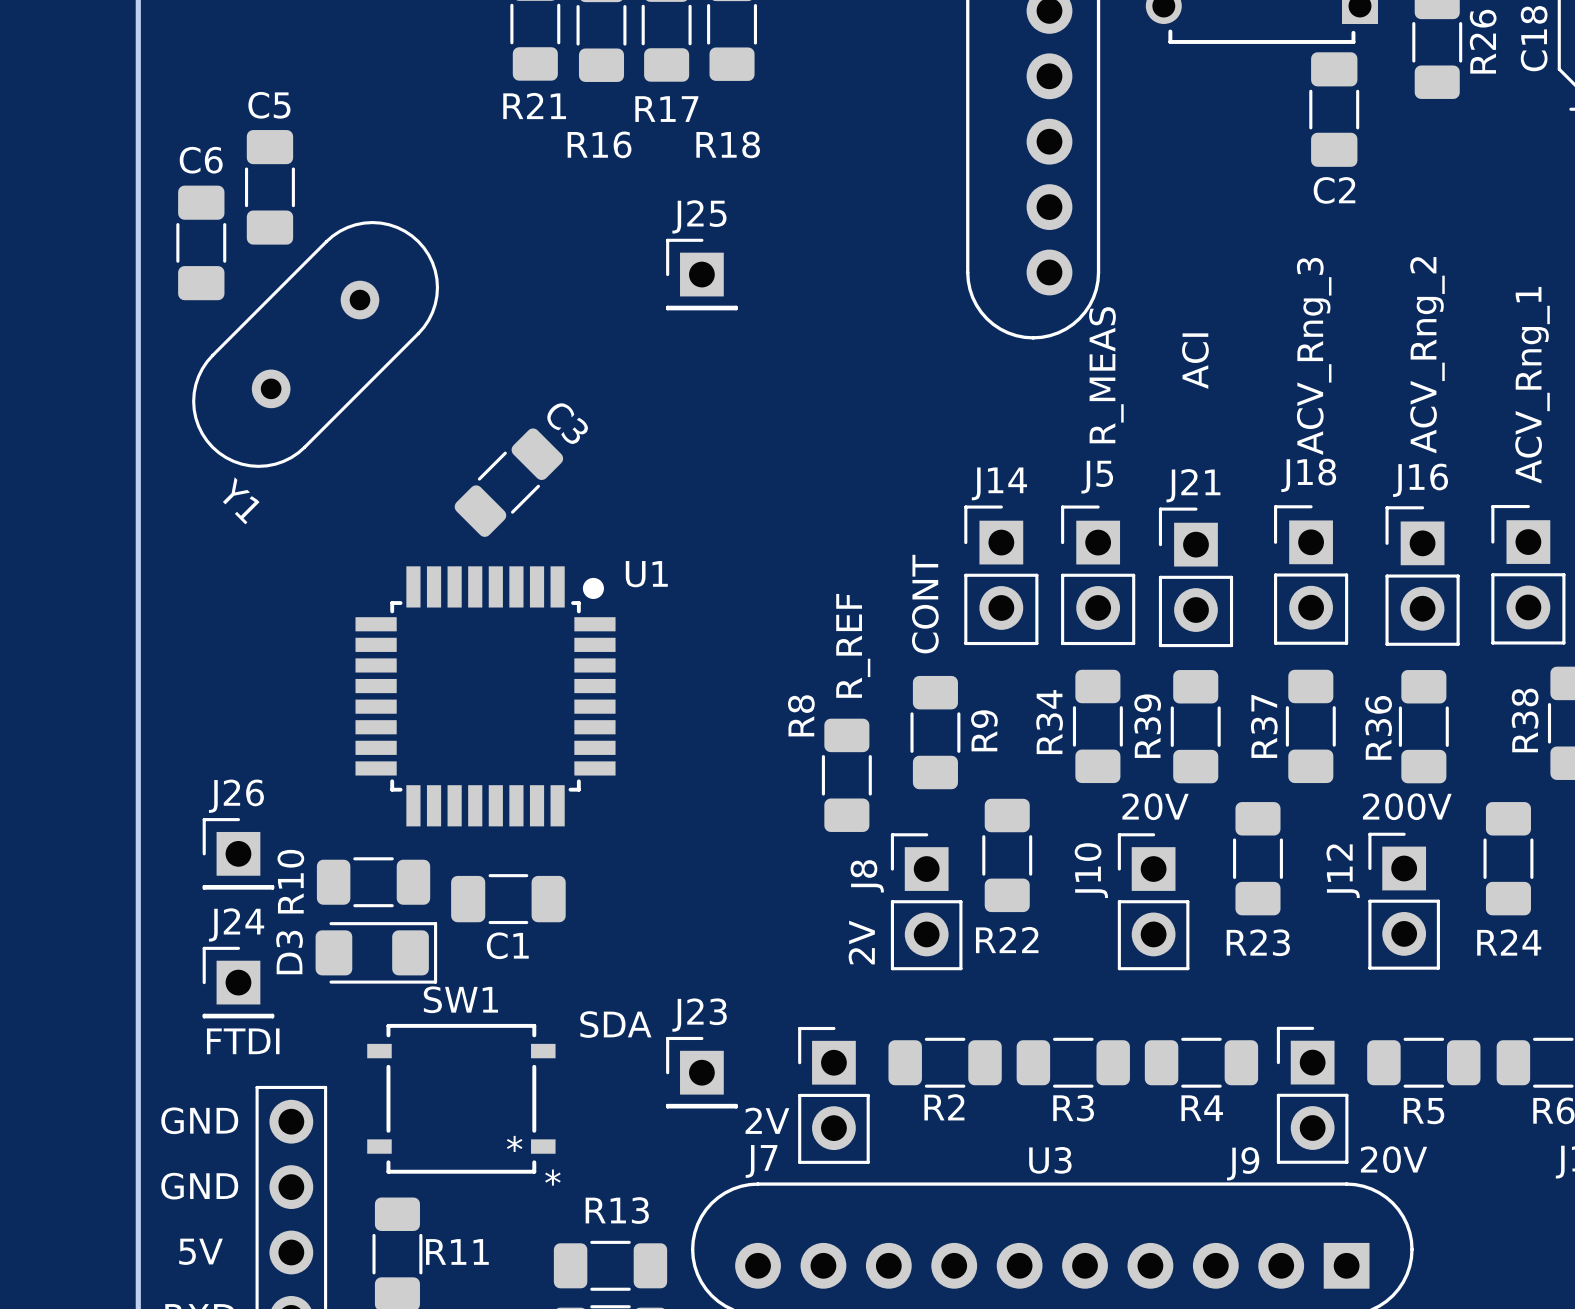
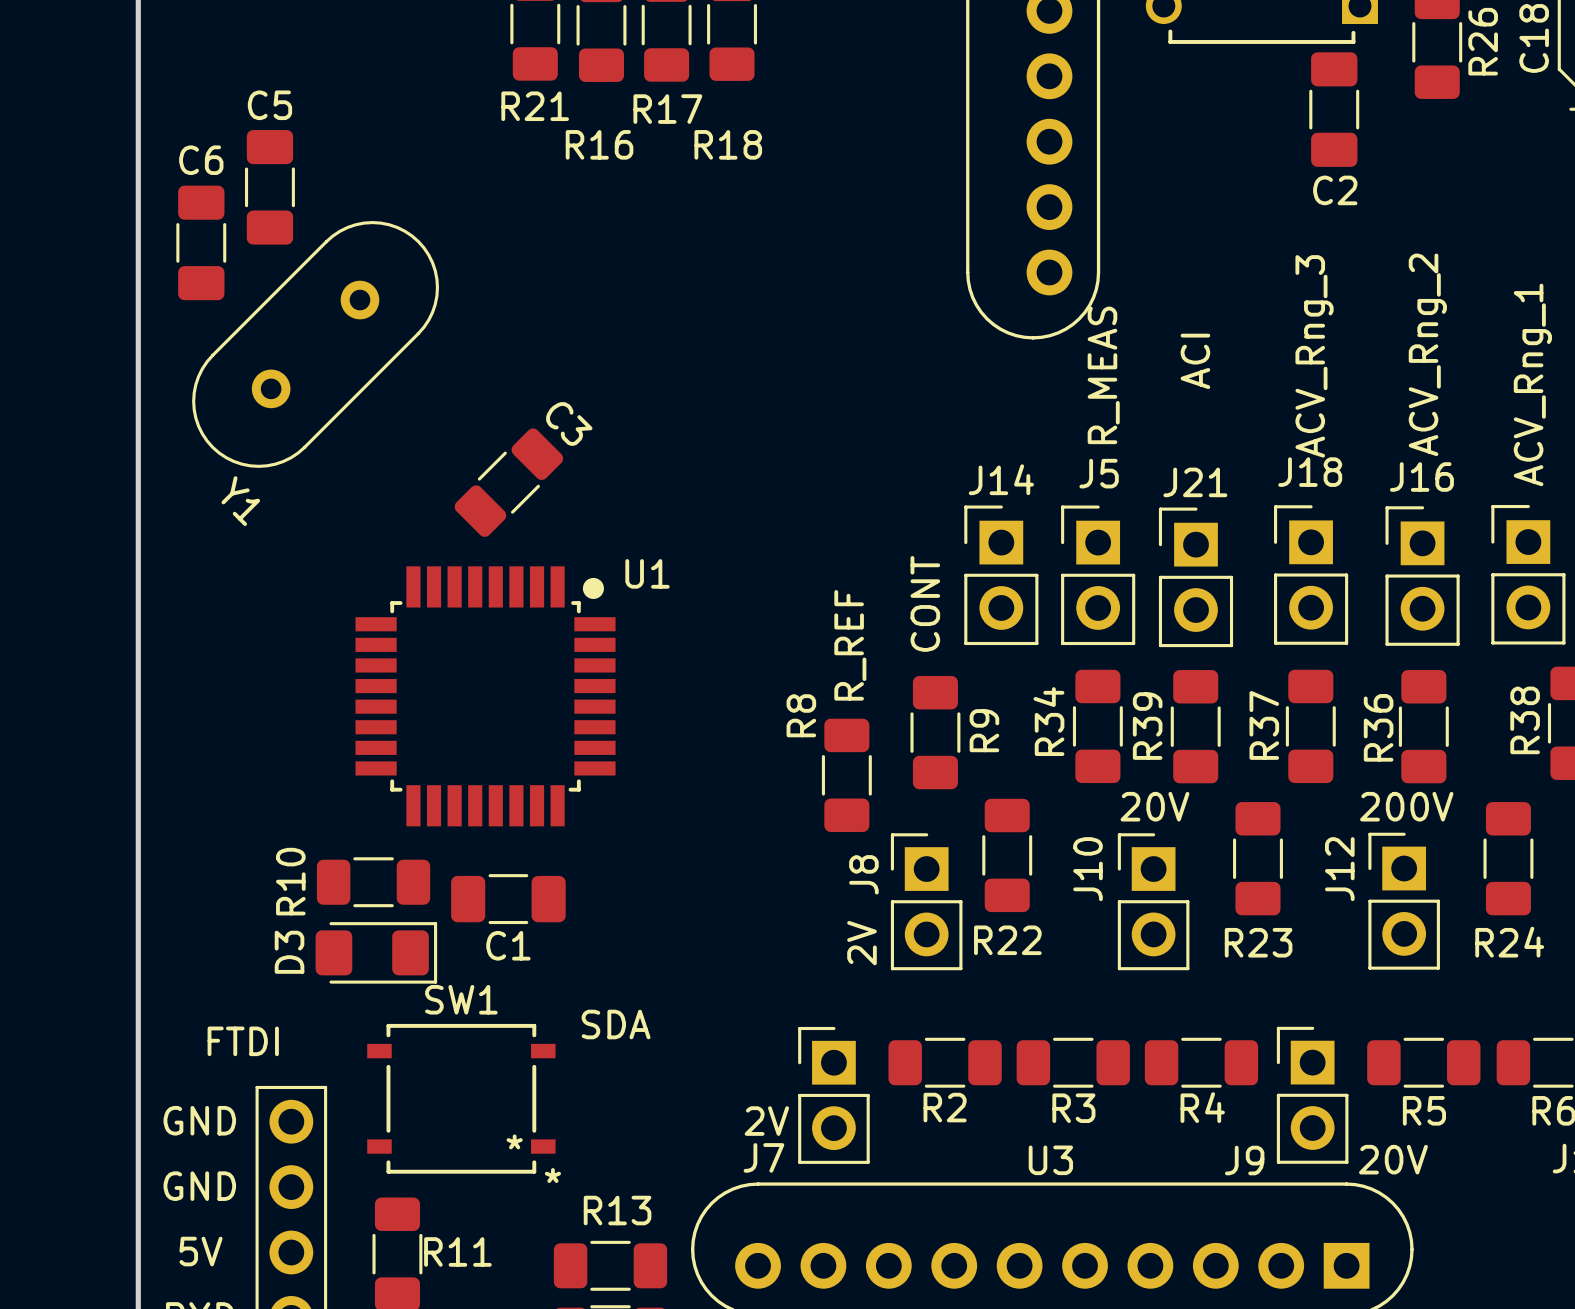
J25: (701, 274) -> none
J26: (238, 853) -> none
J24: (238, 982) -> none
J23: (701, 1072) -> none

